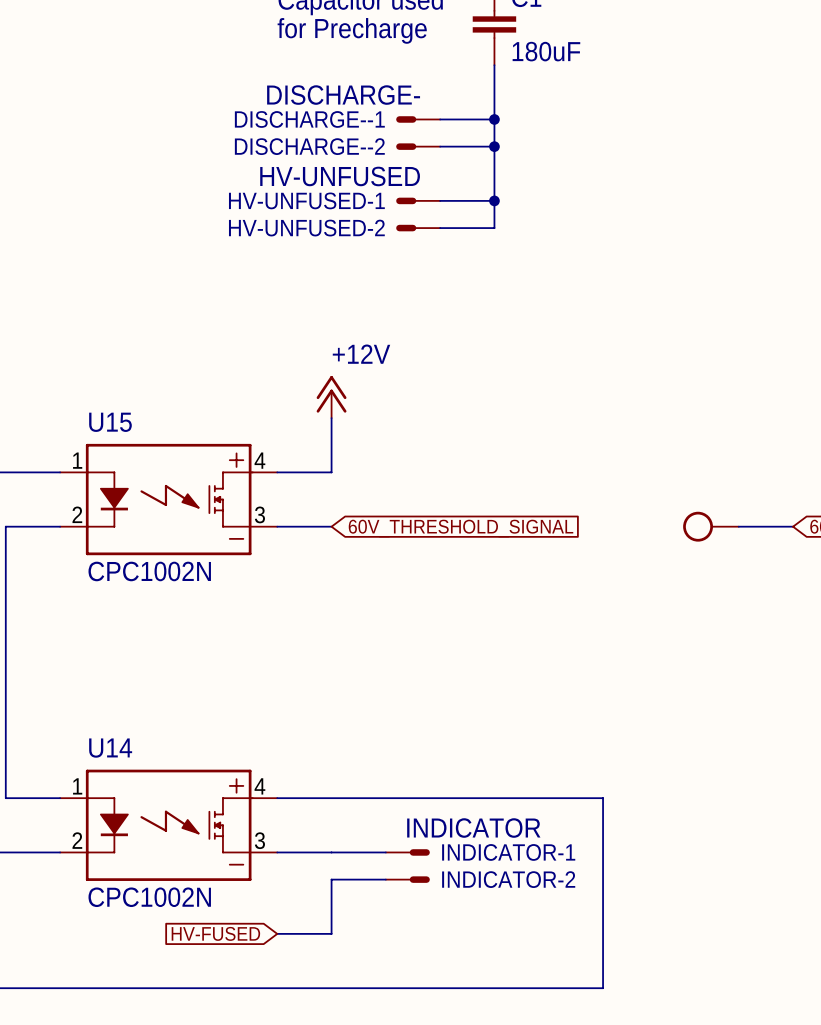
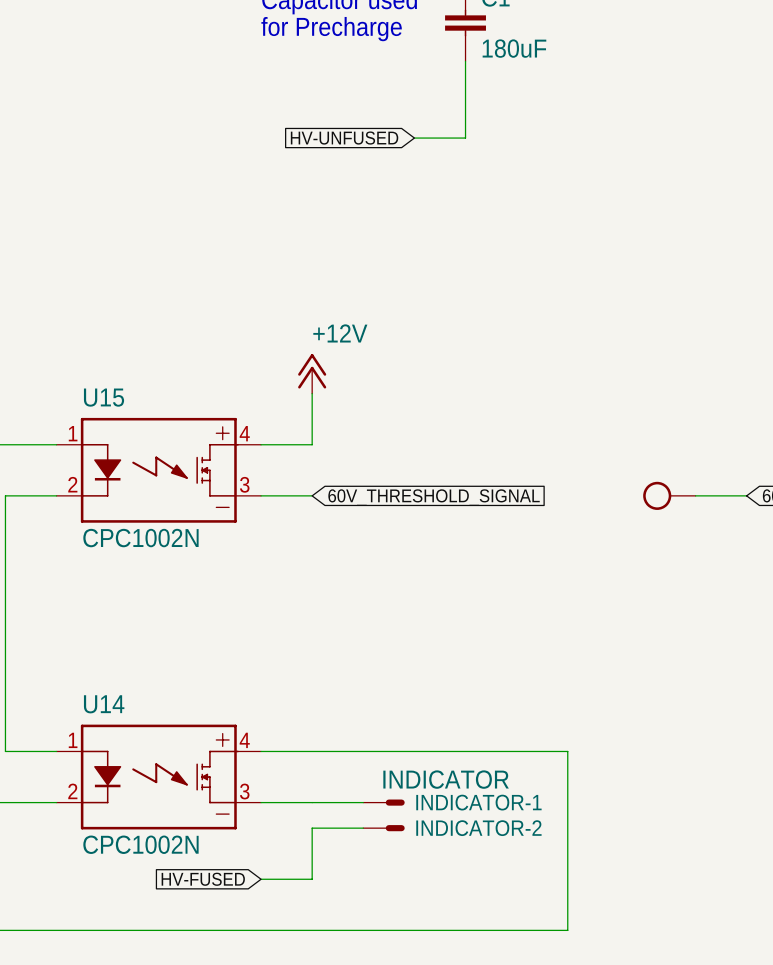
DISCHARGE--1: DISCHARGE- (418, 119) -> none
wire: (440, 119) (494, 119) -> none
junction: (494, 119) -> none
global label: none -> HV-UNFUSED (344, 138)
DISCHARGE--2: (418, 146) -> none
wire: (494, 146) (494, 228) (440, 228) -> none
junction: (494, 146) -> none
HV-UNFUSED-1: HV-UNFUSED (418, 200) -> none
wire: (440, 200) (494, 200) -> none
junction: (494, 200) -> none
HV-UNFUSED-2: (418, 228) -> none

